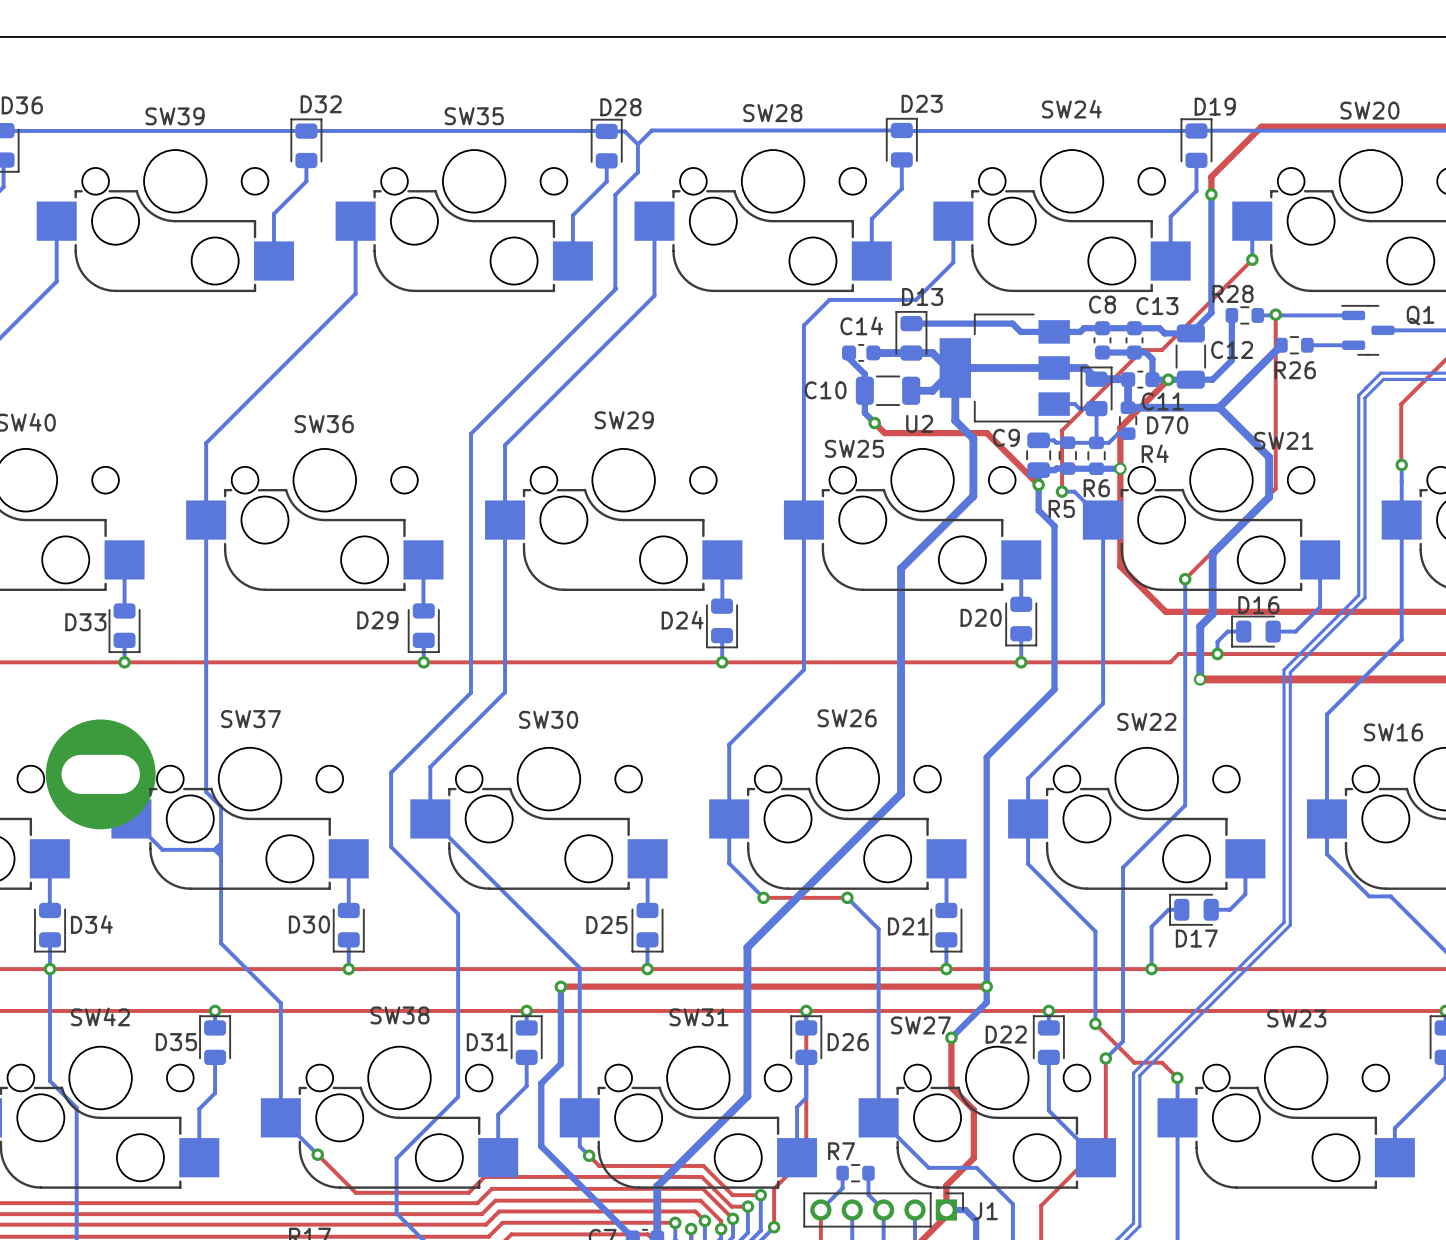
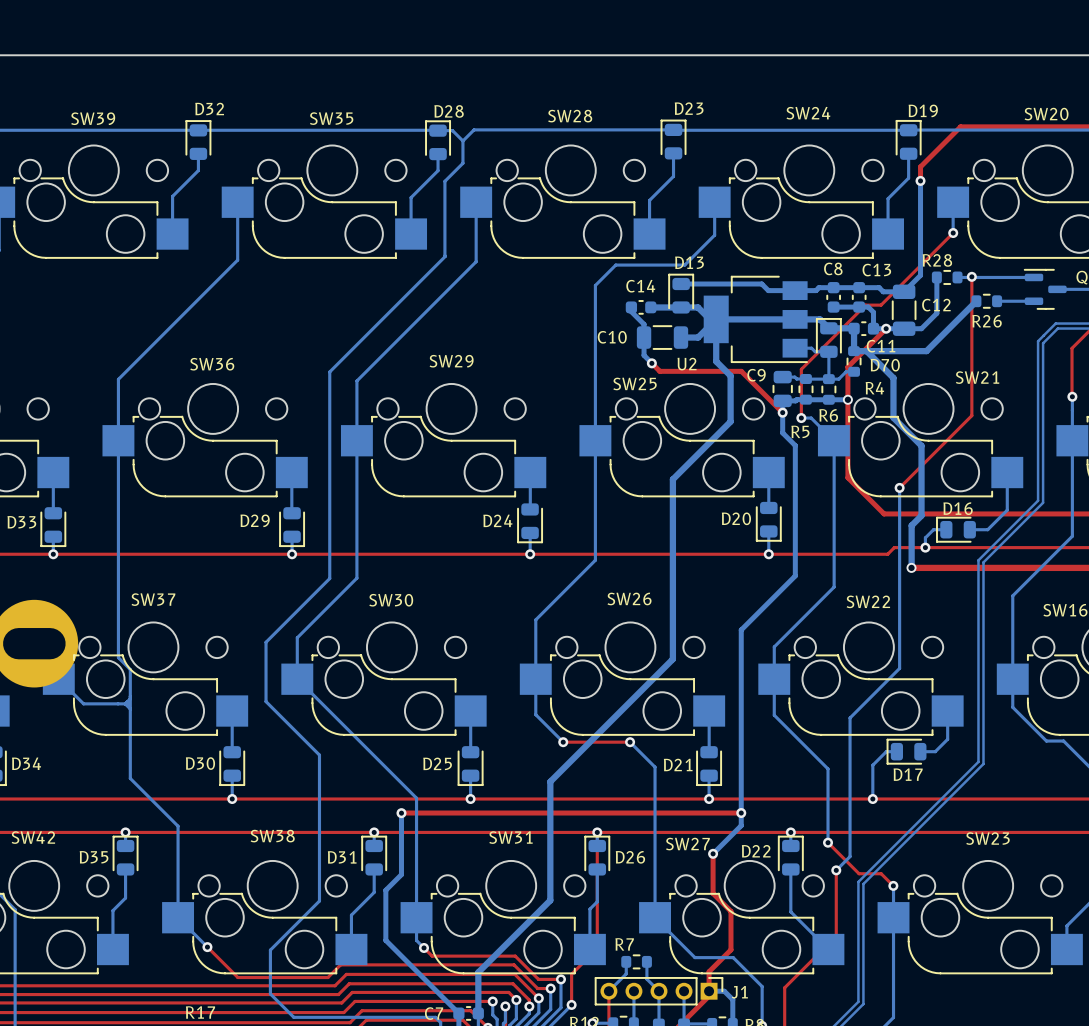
bottom track: (1218, 407) (1269, 457) (1269, 497) (1212, 553) -> (854, 351) (866, 351) (893, 377) (893, 417) (921, 445) (921, 467)

